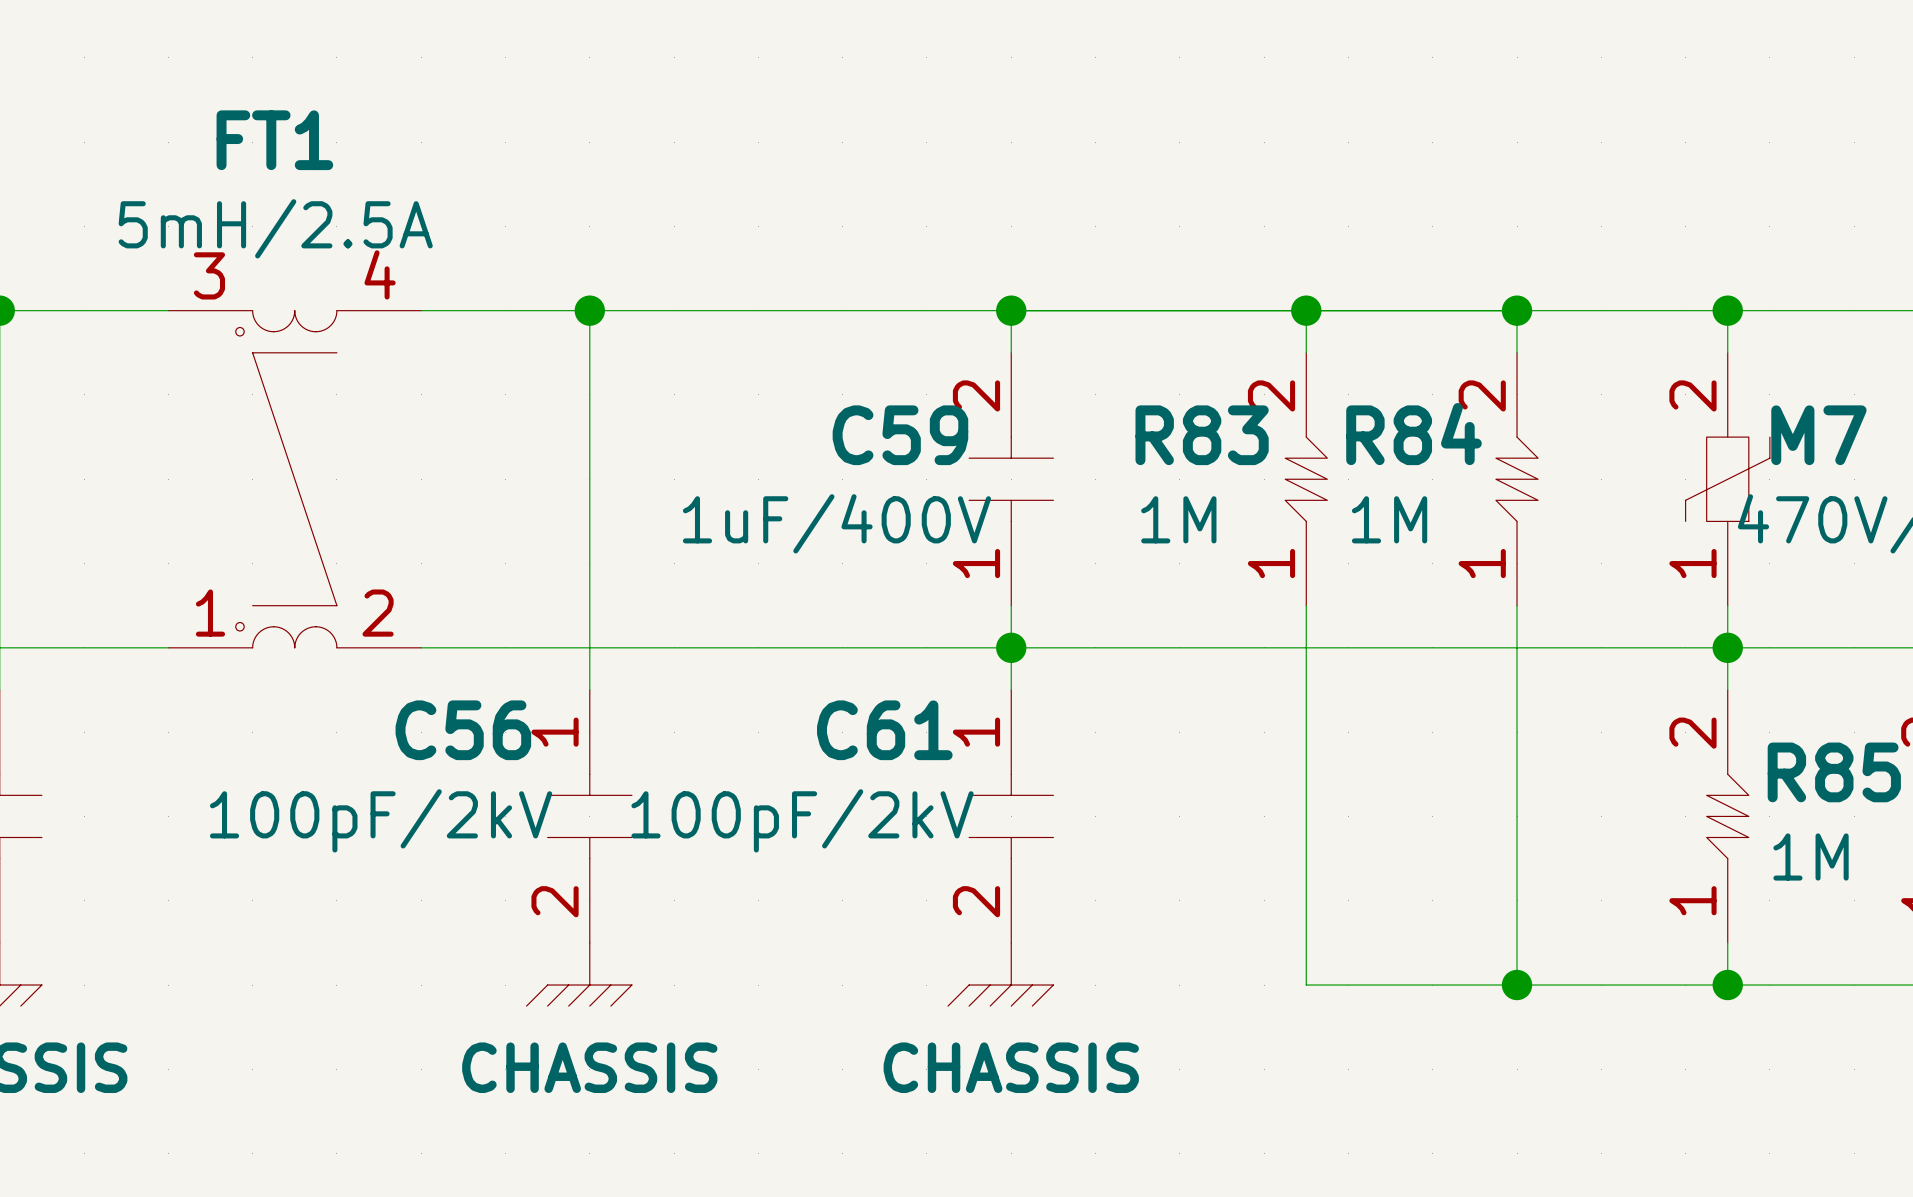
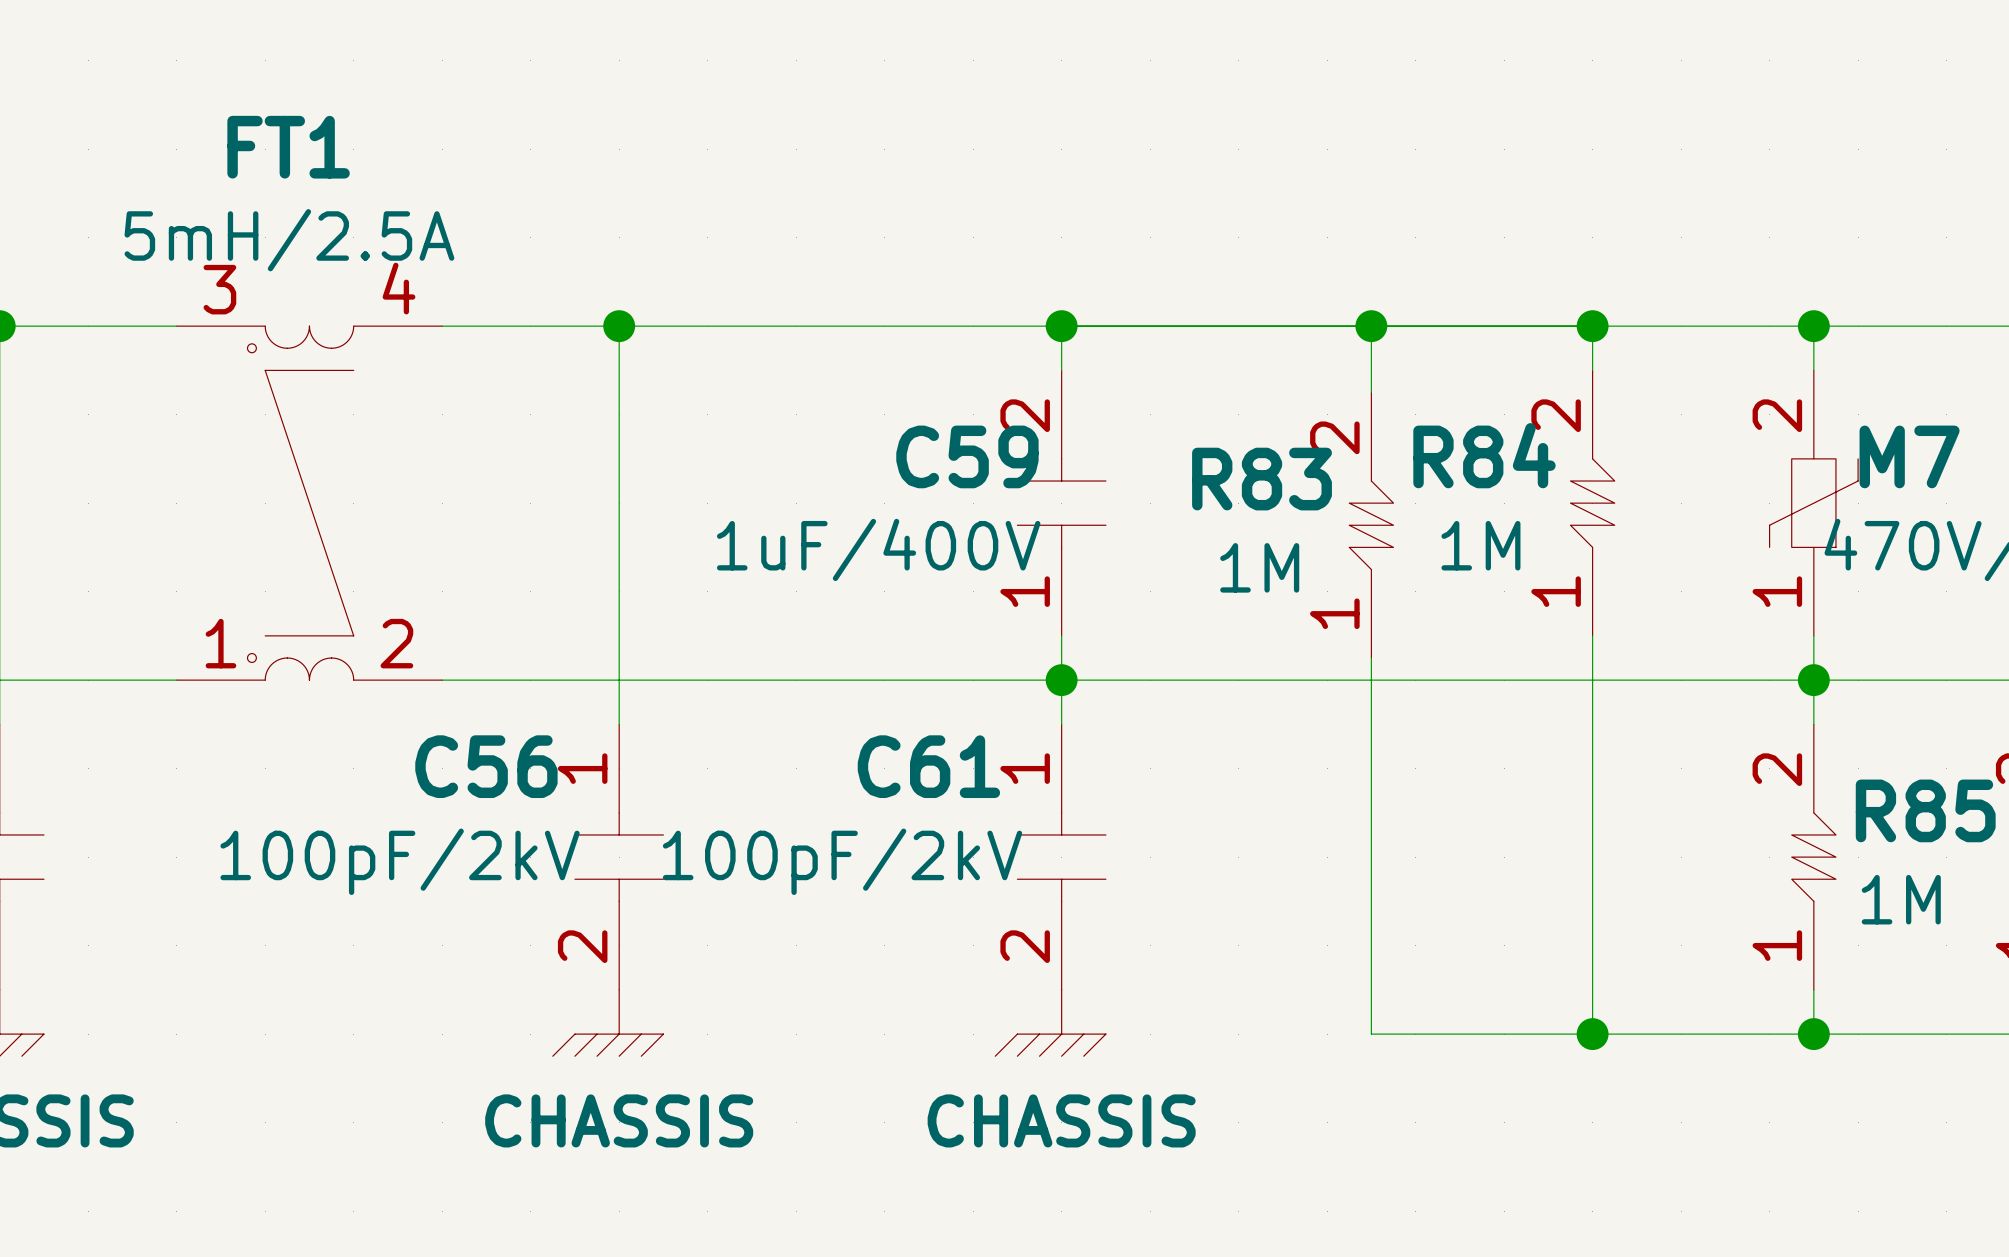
C59 name position: C59 (900, 435) -> C59 (967, 456)
R83 position: (1306, 479) -> (1371, 525)
R83 value position: 1M (1178, 519) -> 1M (1259, 567)
R84 value position: 1M (1389, 519) -> 1M (1480, 545)

